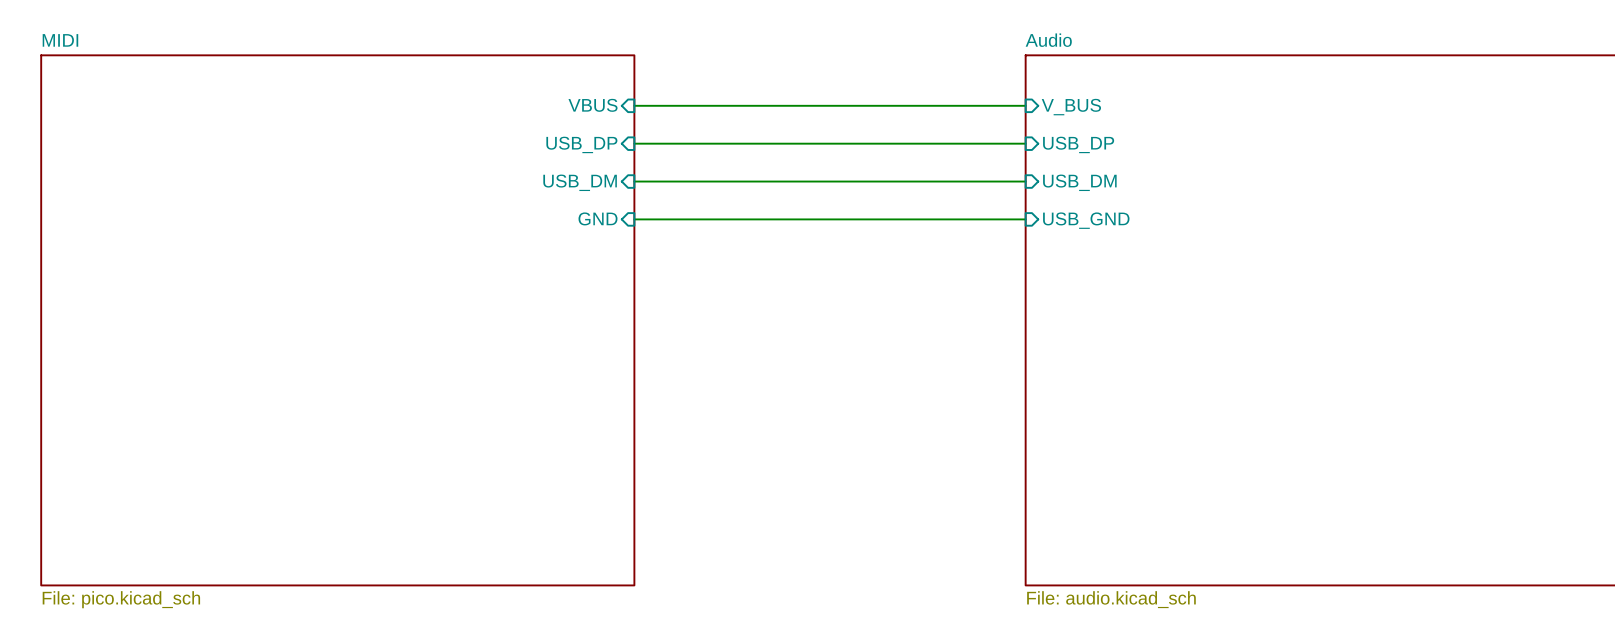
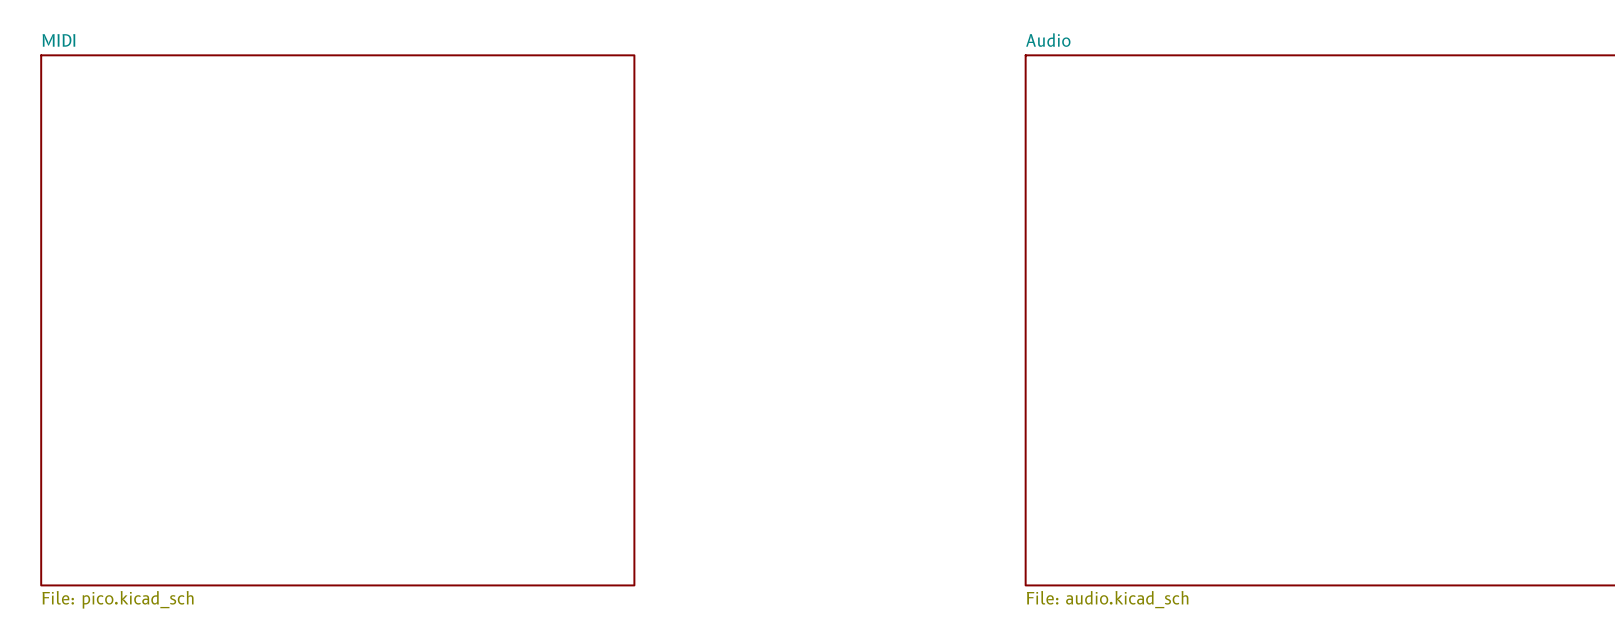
sheet pin: VBUS (593, 105) -> none
wire: (634, 105) (1025, 105) -> none
sheet pin: V_BUS (1071, 107) -> none
wire: (634, 143) (1025, 143) -> none
sheet pin: USB_DP (581, 144) -> none
sheet pin: USB_DP (1078, 144) -> none
wire: (634, 181) (1025, 181) -> none
sheet pin: USB_DM (580, 182) -> none
sheet pin: USB_DM (1079, 182) -> none
sheet pin: GND (598, 218) -> none
wire: (634, 219) (1025, 219) -> none
sheet pin: USB_GND (1086, 220) -> none

